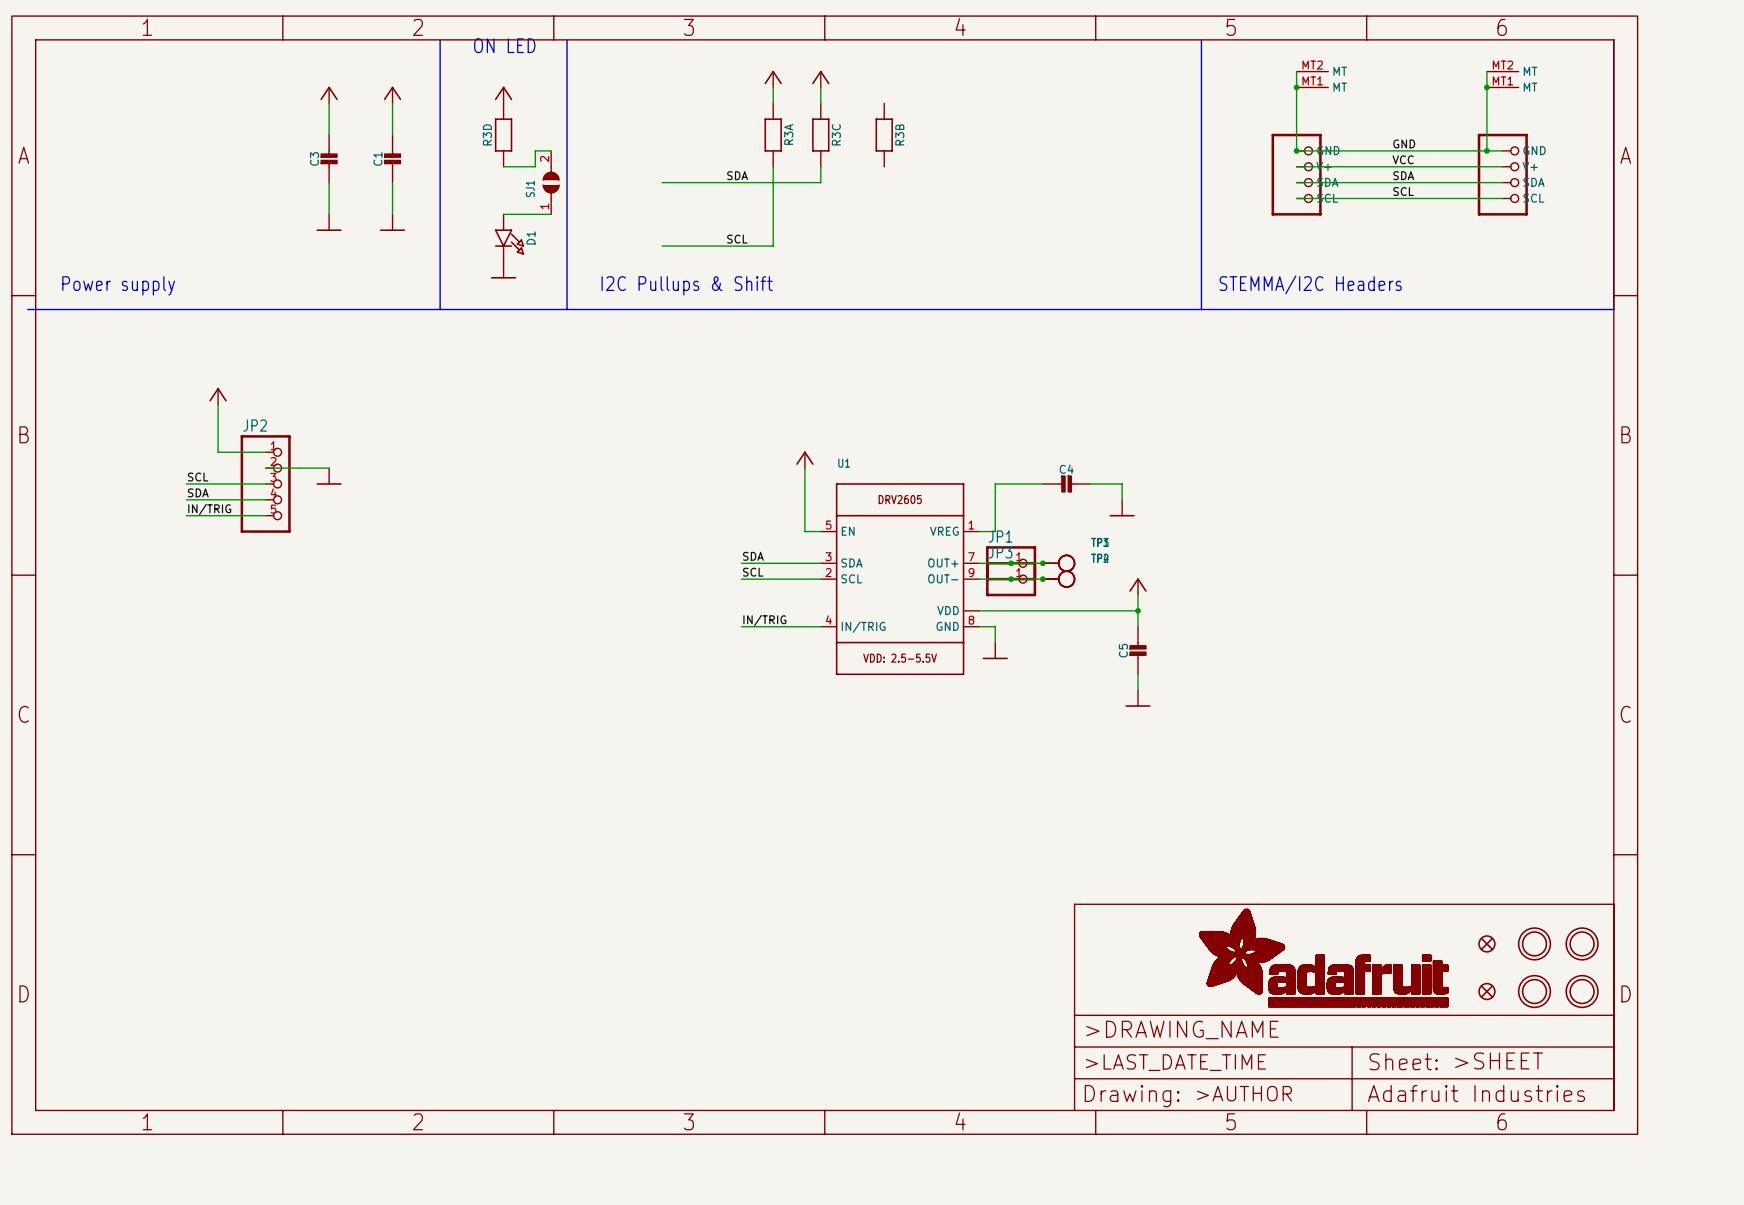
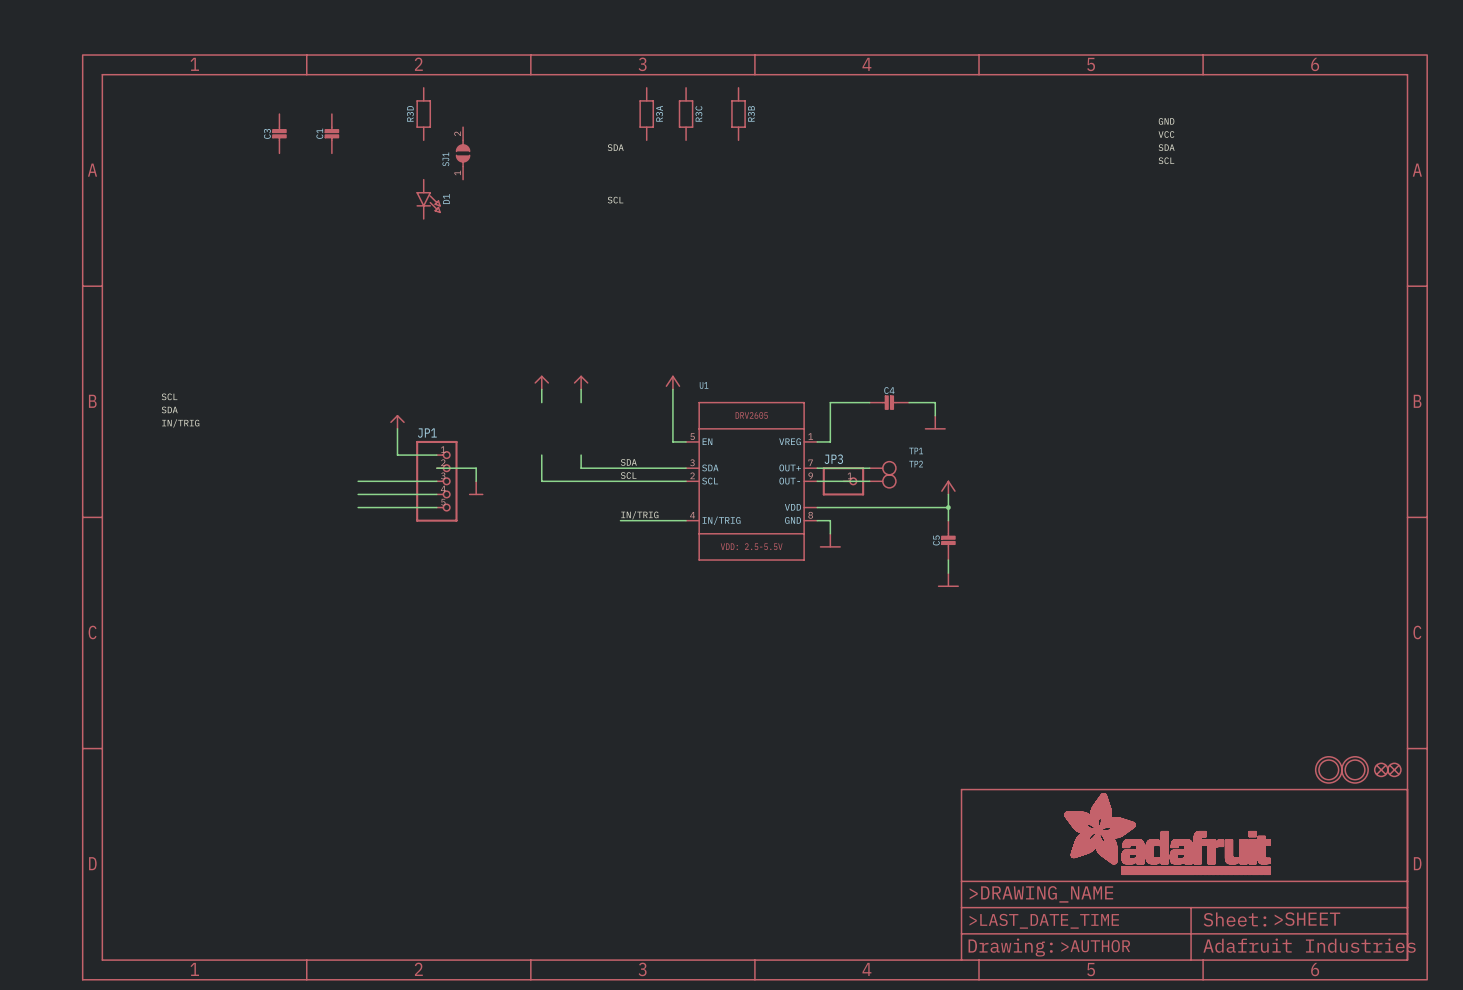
line: (440, 39) (440, 309) -> none
line: (567, 39) (567, 309) -> none
line: (1201, 39) (1201, 309) -> none
line: (1613, 39) (1613, 309) (27, 309) -> none
text: ON LED (504, 45) -> none
wire: (1296, 71) (1296, 150) (1502, 150) -> none
part: (1312, 71) -> none
wire: (1486, 71) (1486, 150) -> none
part: (1502, 71) -> none
power symbol: (773, 79) -> none
power symbol: (820, 79) -> none
wire: (773, 87) (773, 103) -> none
wire: (820, 87) (820, 103) -> none
junction: (1296, 87) -> none
part: (1312, 87) -> none
junction: (1486, 87) -> none
part: (1502, 87) -> none
power symbol: (329, 94) -> none
power symbol: (392, 94) -> none
power symbol: (503, 94) -> none
wire: (329, 103) (329, 135) -> none
wire: (392, 103) (392, 135) -> none
wire: (551, 150) (535, 150) (535, 166) (503, 166) -> none
junction: (1296, 150) -> none
junction: (1486, 150) -> none
wire: (773, 166) (773, 246) (662, 246) -> none
wire: (820, 166) (820, 182) (662, 182) -> none
wire: (1296, 166) (1502, 166) -> none
part: (1296, 174) -> none
part: (1502, 174) -> none
wire: (329, 182) (329, 214) -> none
wire: (392, 182) (392, 214) -> none
wire: (1296, 182) (1502, 182) -> none
wire: (1296, 198) (1502, 198) -> none
wire: (503, 214) (551, 214) -> none
power symbol: (329, 222) -> none
power symbol: (392, 222) -> none
power symbol: (503, 270) -> none
text: STEMMA/I2C Headers (1310, 284) -> none
text: Power supply (118, 285) -> none
text: I2C Pullups & Shift (687, 285) -> none
power symbol: (218, 396) -> none
wire: (218, 404) (218, 452) (265, 452) -> none
power symbol: none -> (541, 382)
power symbol: none -> (581, 382)
wire: (265, 468) (329, 468) -> none
wire: none -> (541, 389) (541, 402)
wire: none -> (581, 389) (581, 402)
power symbol: (329, 476) -> none
wire: (186, 483) (265, 483) -> none
JP2: (265, 483) -> none
wire: (186, 499) (265, 499) -> none
power symbol: none -> (397, 421)
wire: (186, 515) (265, 515) -> none
wire: none -> (397, 428) (397, 455) (436, 455)
JP1 name position: JP1 (1000, 536) -> JP1 (427, 433)
JP1 symbol: [986, 546, 1037, 581] -> [416, 440, 458, 522]
wire: none -> (541, 455) (541, 481) (620, 481)
wire: none -> (581, 455) (581, 468) (620, 468)
wire: none -> (436, 468) (476, 468) (476, 481)
junction: (1011, 563) -> none
junction: (1042, 563) -> none
part: (1059, 563) -> none
drawing position: (824, 575) -> (754, 517)
wire: none -> (358, 481) (436, 481)
junction: (1011, 579) -> none
junction: (1042, 579) -> none
part: (1059, 579) -> none
power symbol: none -> (476, 488)
wire: none -> (358, 494) (436, 494)
wire: none -> (358, 507) (436, 507)
part: none -> (1355, 769)
part: none -> (1381, 769)
part: none -> (1394, 769)
part: (1486, 943) -> none
part: (1534, 943) -> none
part position: (1582, 943) -> (1328, 769)
part: (1486, 991) -> none
part: (1534, 991) -> none
part: (1582, 991) -> none

